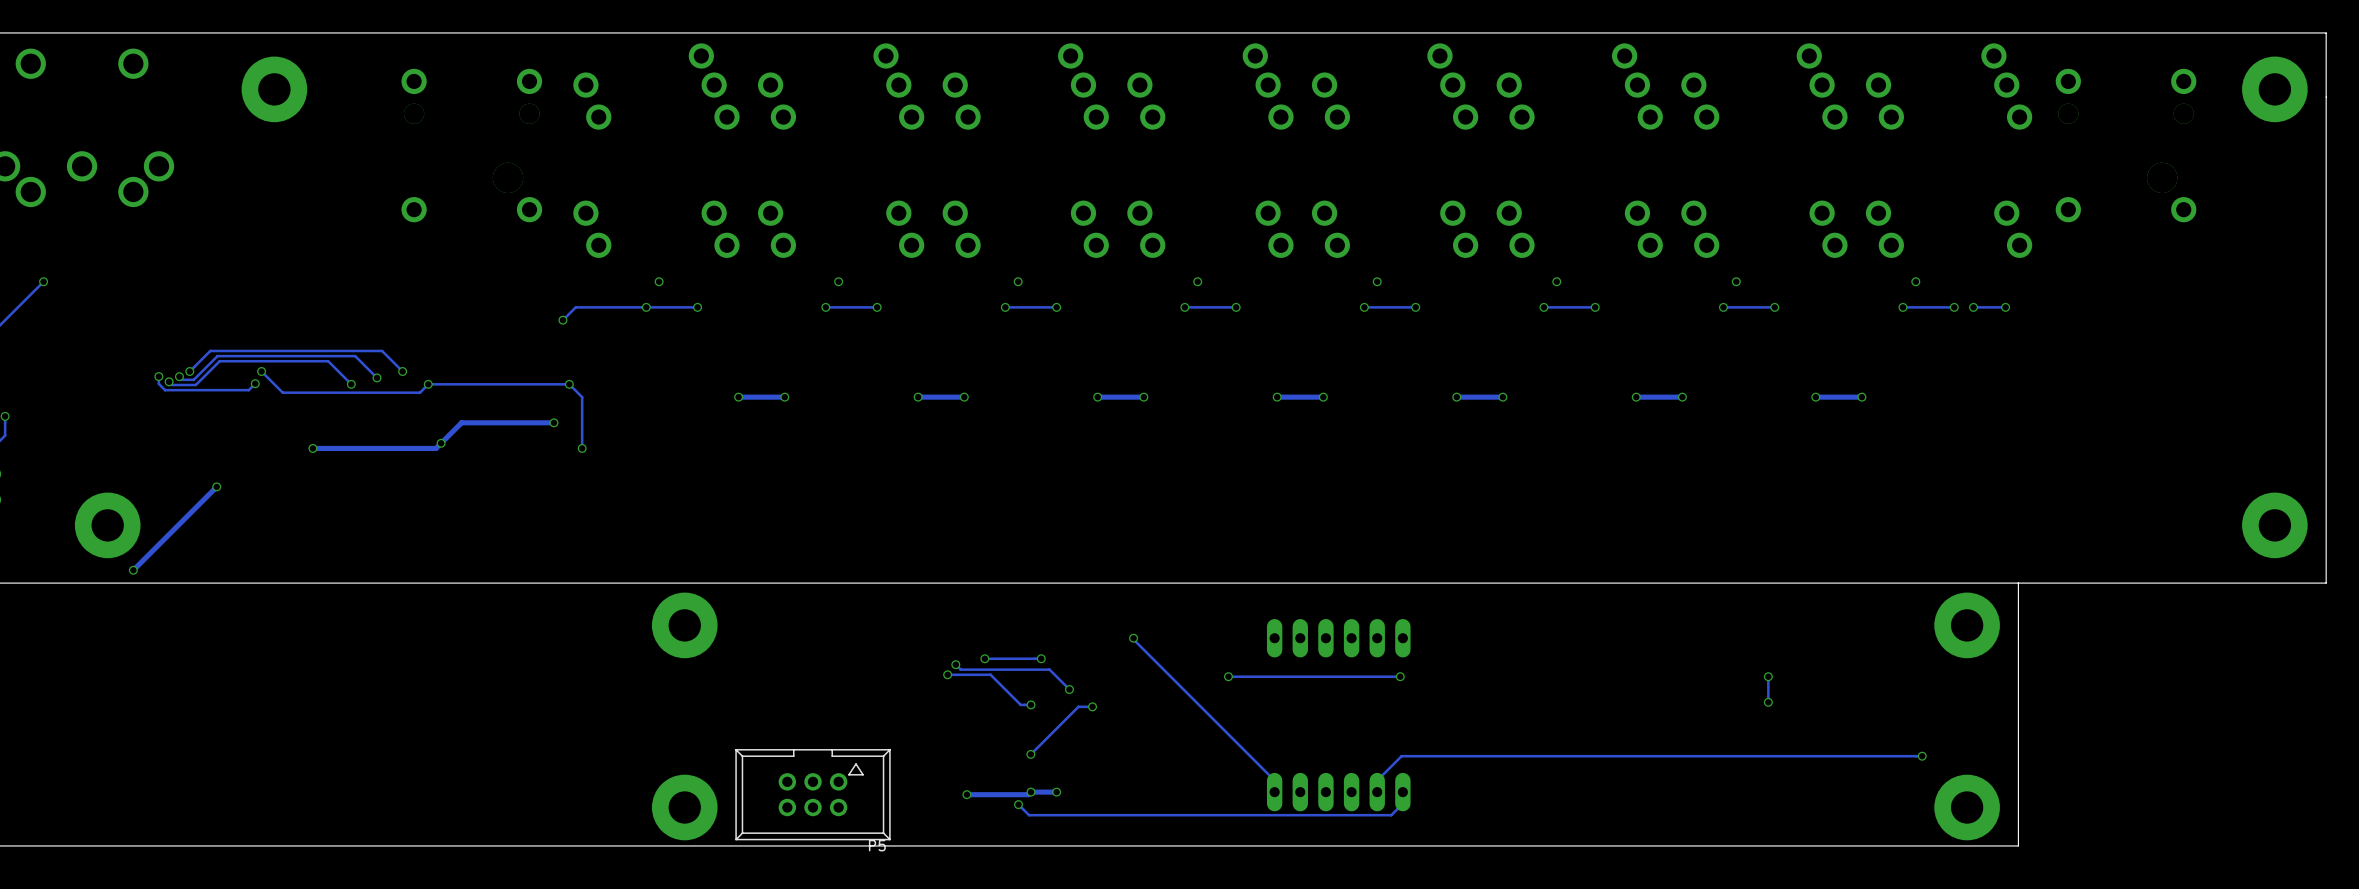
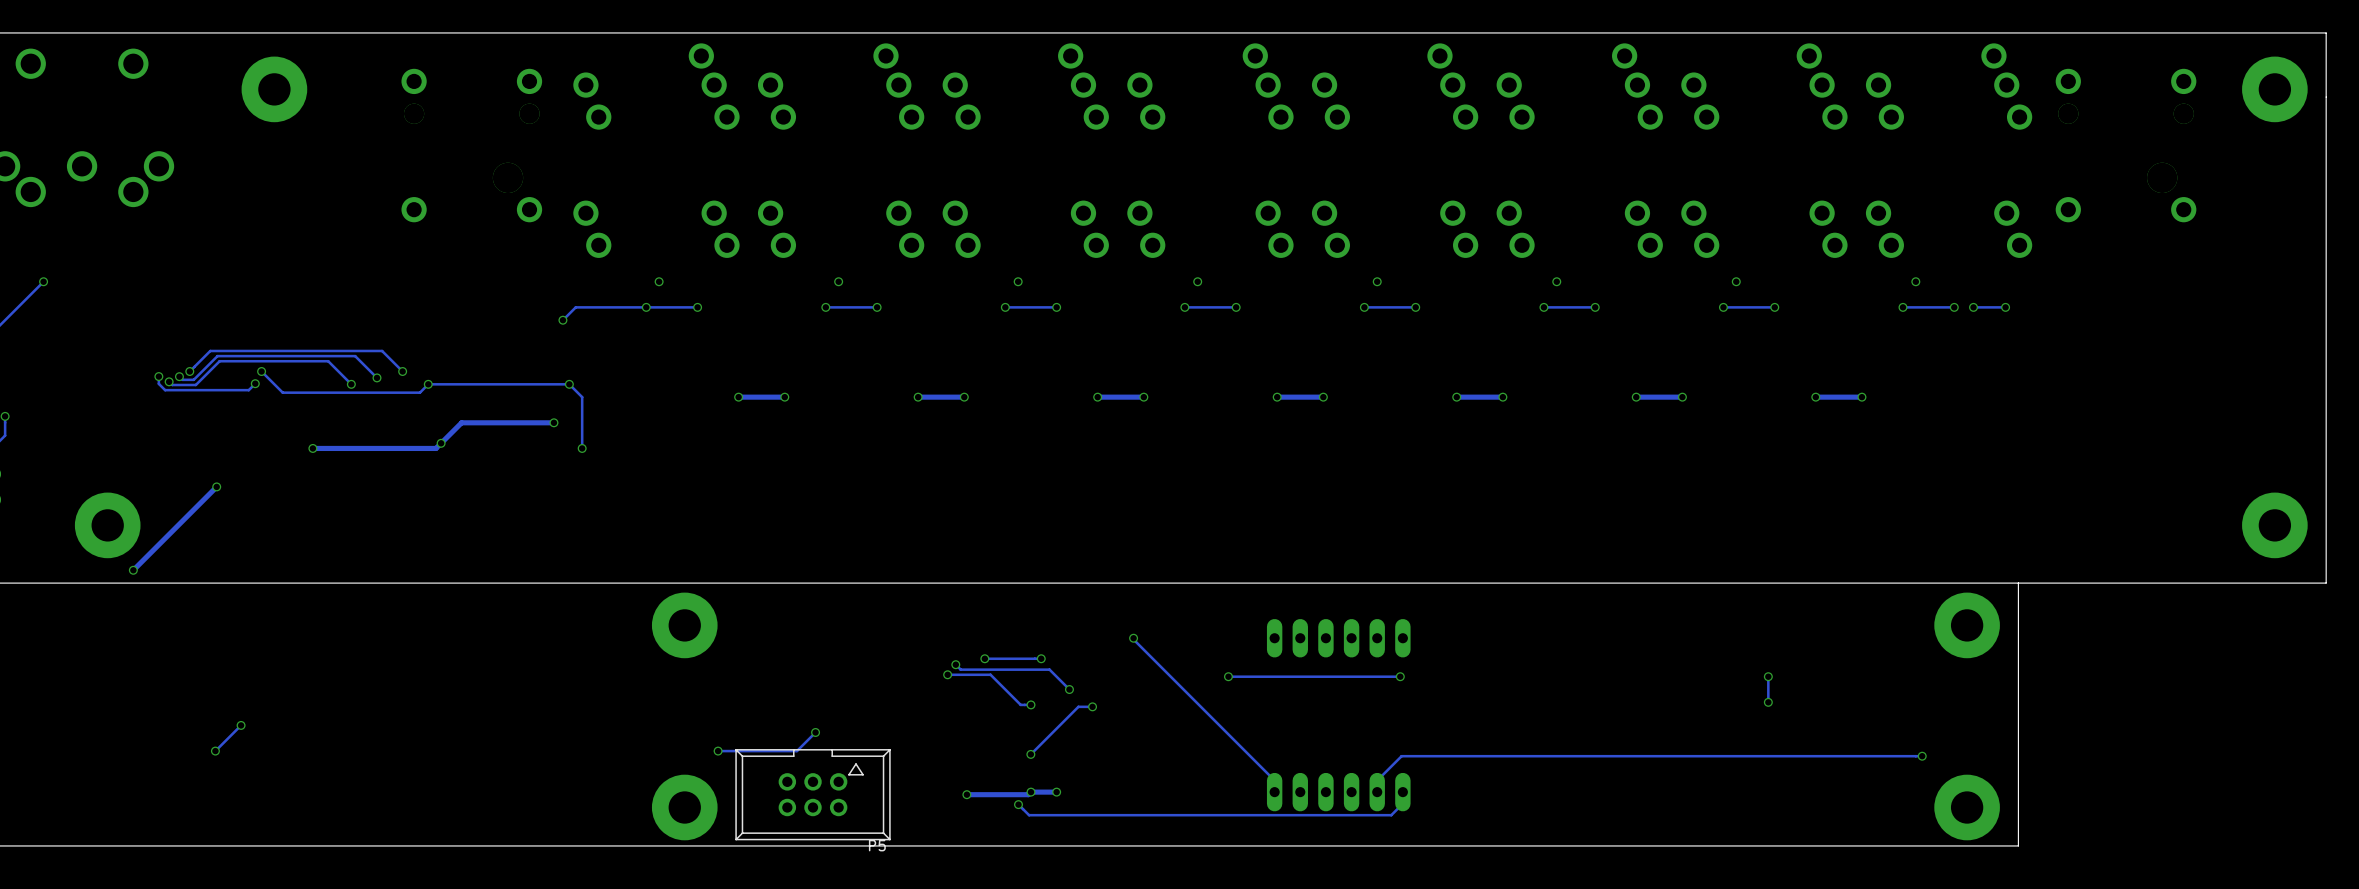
track: none -> (241, 725) (215, 751)
via: none -> (241, 725)
track: none -> (815, 732) (796, 751) (718, 751)
via: none -> (815, 732)
via: none -> (215, 751)
via: none -> (718, 751)

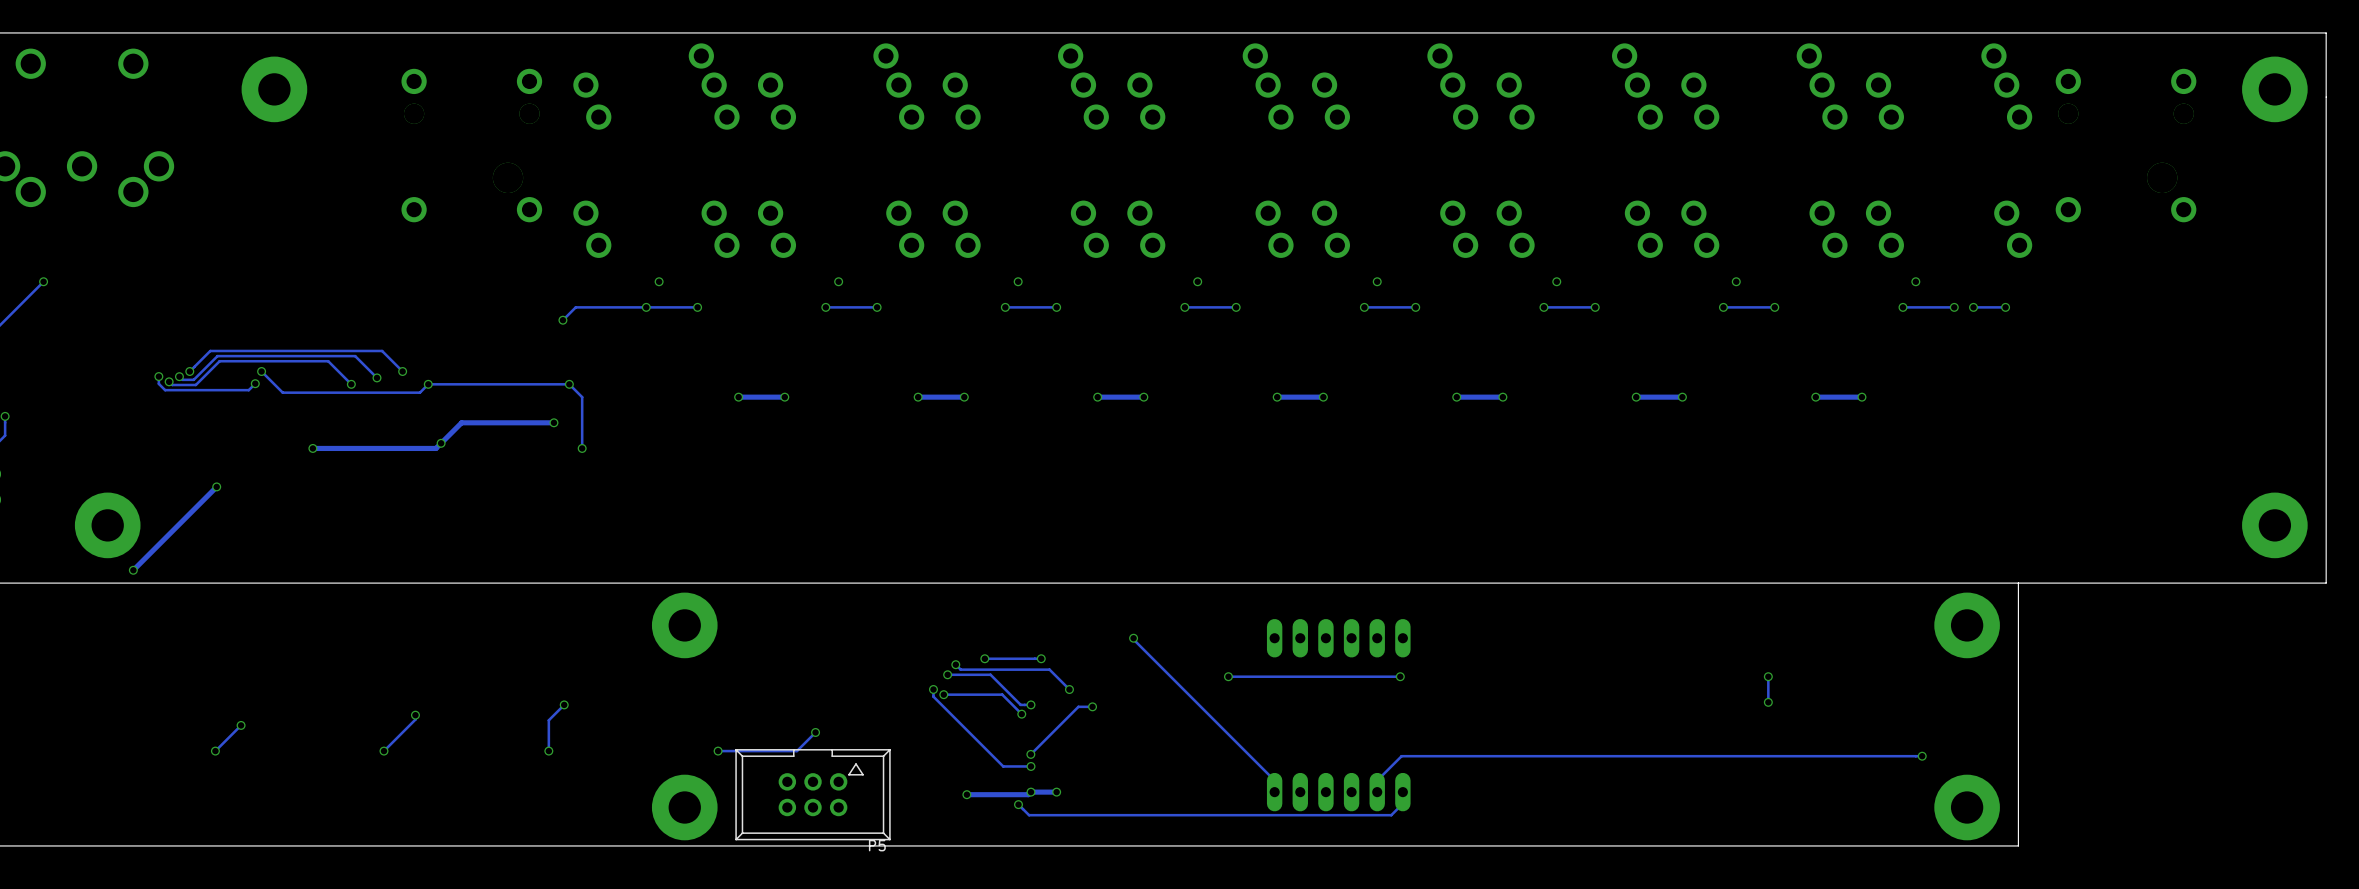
track: none -> (933, 689) (933, 696) (1003, 766) (1030, 766)
via: none -> (933, 689)
track: none -> (943, 694) (1002, 694) (1021, 714)
via: none -> (943, 694)
track: none -> (564, 704) (548, 720) (548, 751)
via: none -> (564, 704)
via: none -> (1021, 714)
track: none -> (415, 715) (415, 719) (383, 751)
via: none -> (415, 715)
via: none -> (383, 751)
via: none -> (548, 751)
via: none -> (1030, 766)

